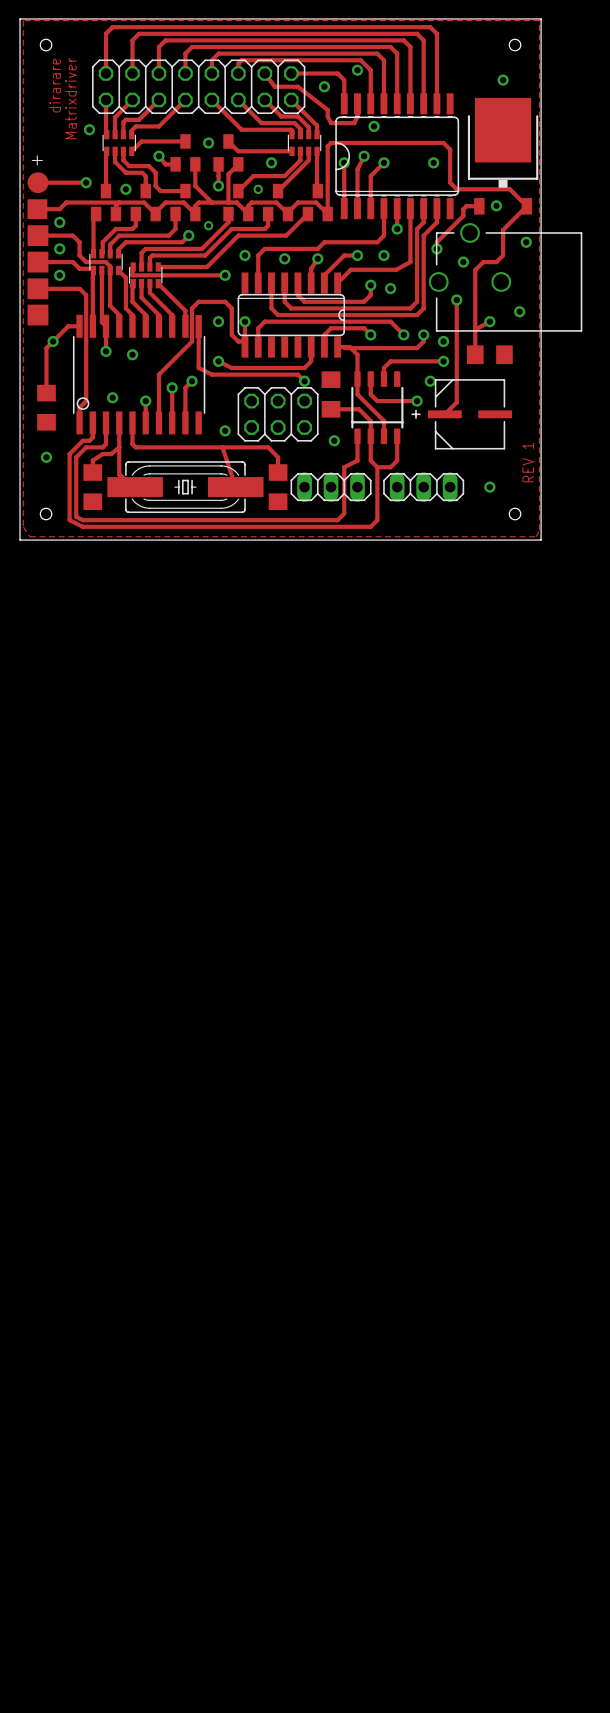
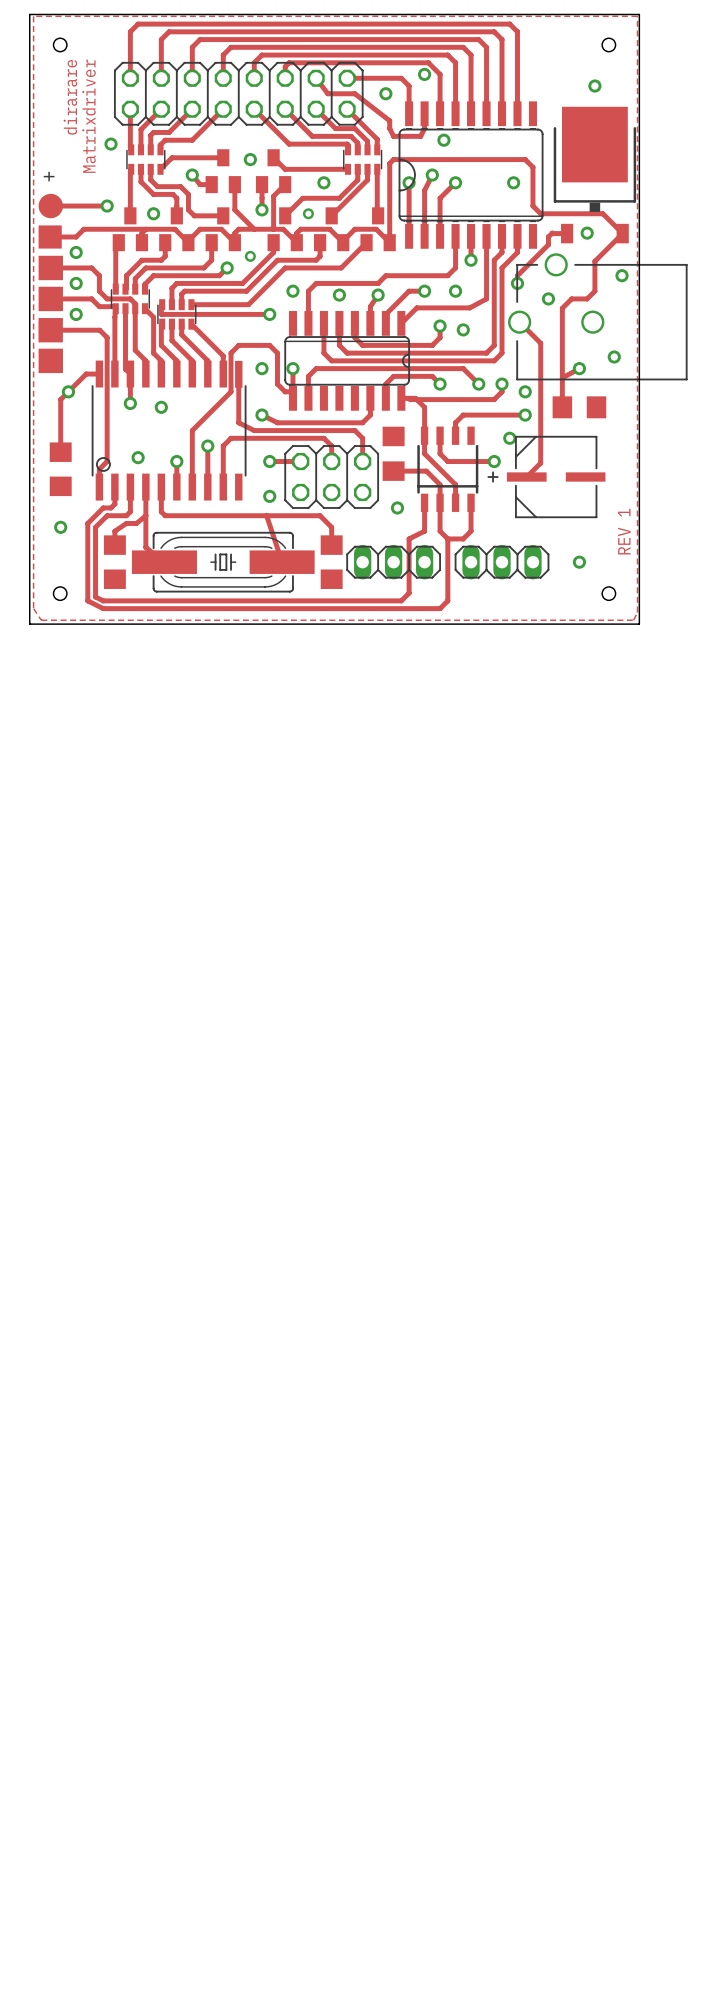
track: none -> (519, 322) (540, 343)
via: (456, 299) -> none
track: none -> (231, 438) (323, 438) (331, 446) (331, 461)
via position: (192, 381) -> (269, 461)
track: none -> (362, 438) (362, 461)
via: (304, 381) -> none
track: none -> (269, 461) (300, 461)

